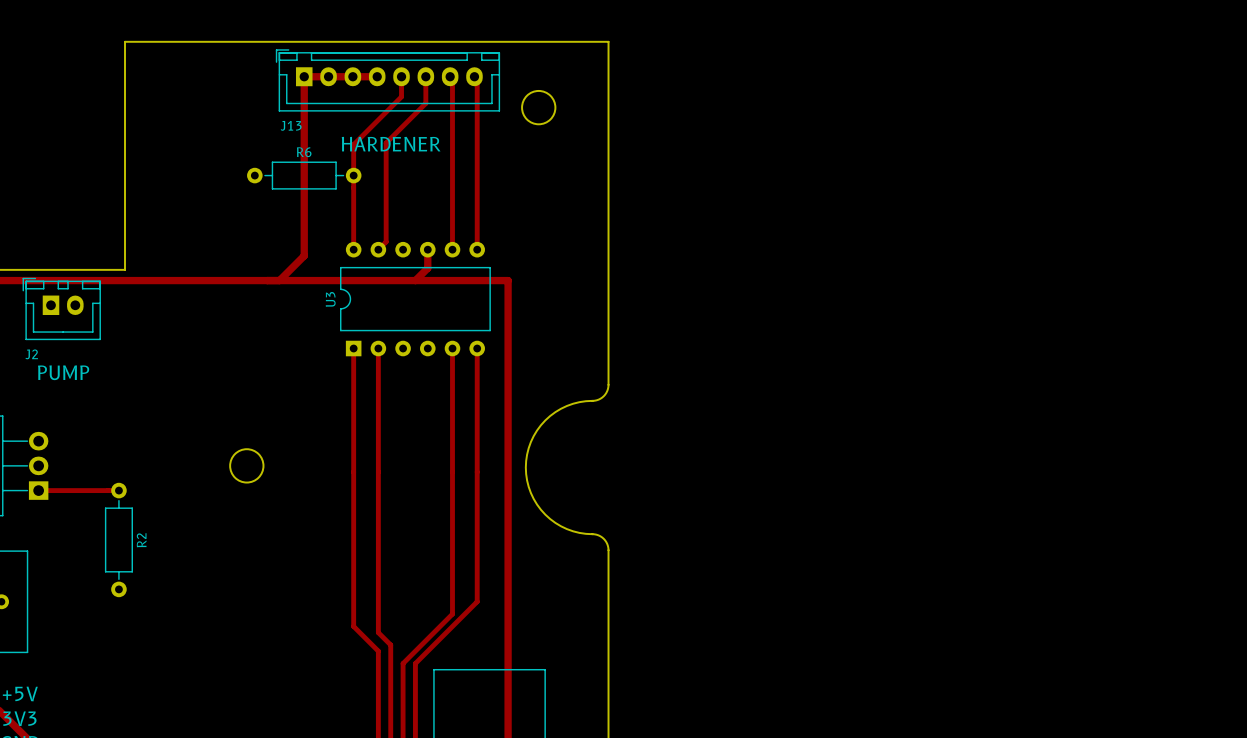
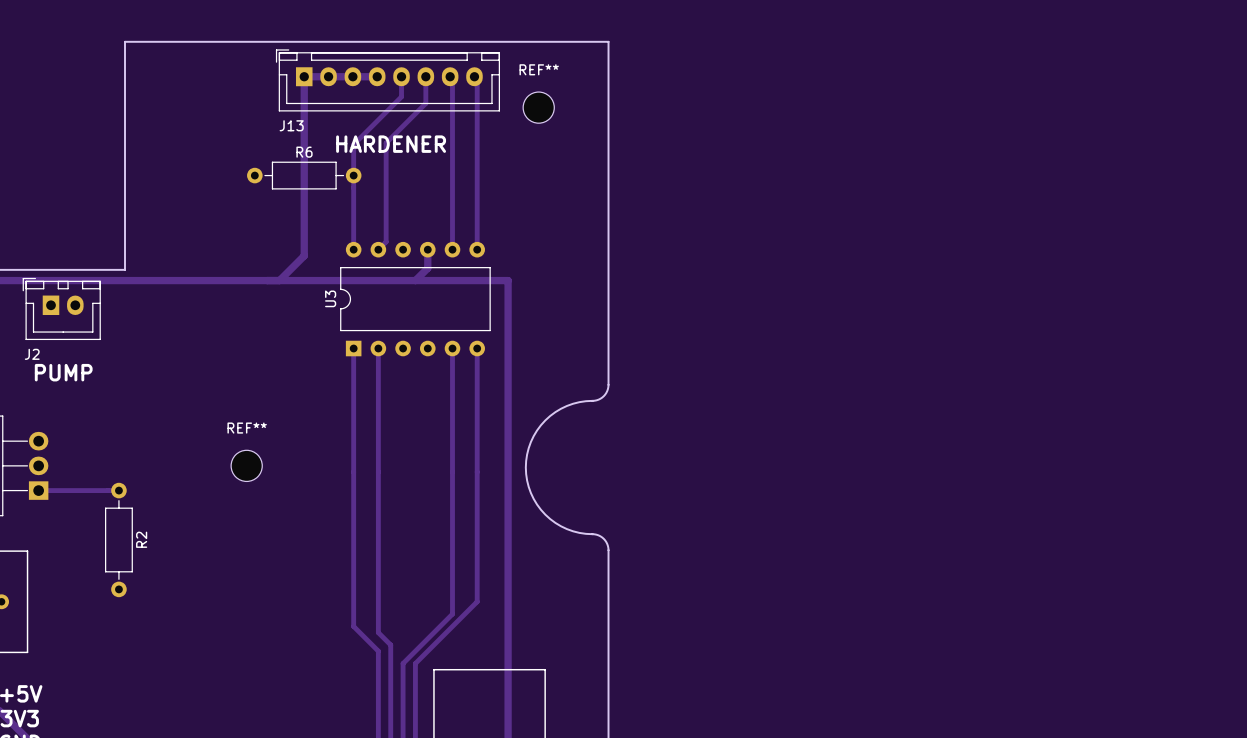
round board edge: [521, 89, 557, 126] -> none
REF**: none -> (538, 107)
round board edge: [229, 448, 265, 484] -> none
REF**: none -> (246, 465)

